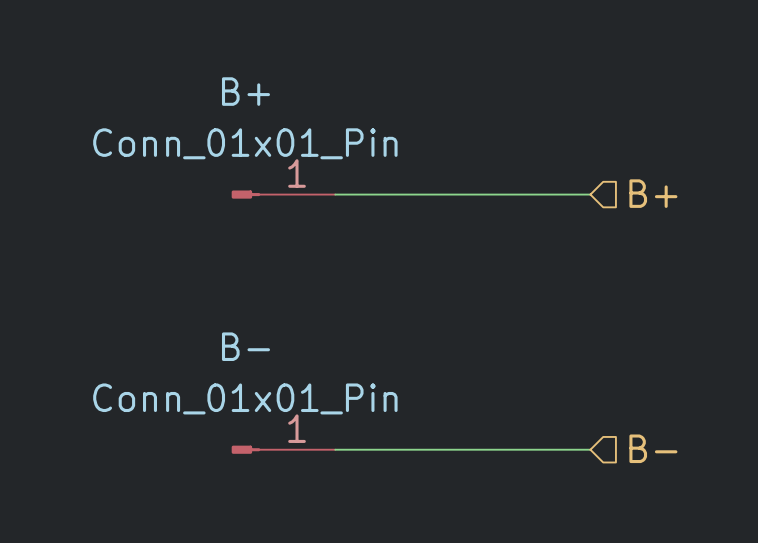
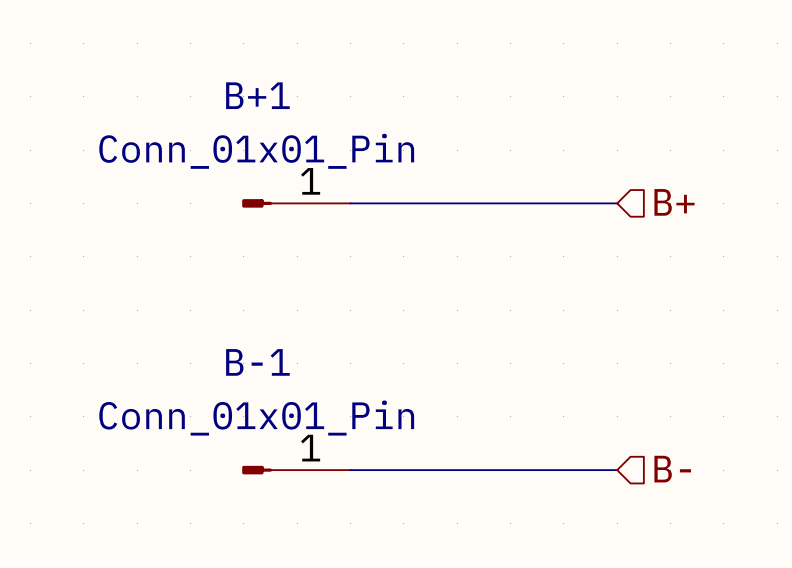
B+ name: B+ (245, 91) -> B+1 (257, 95)
B- name: B- (245, 346) -> B-1 (257, 362)

